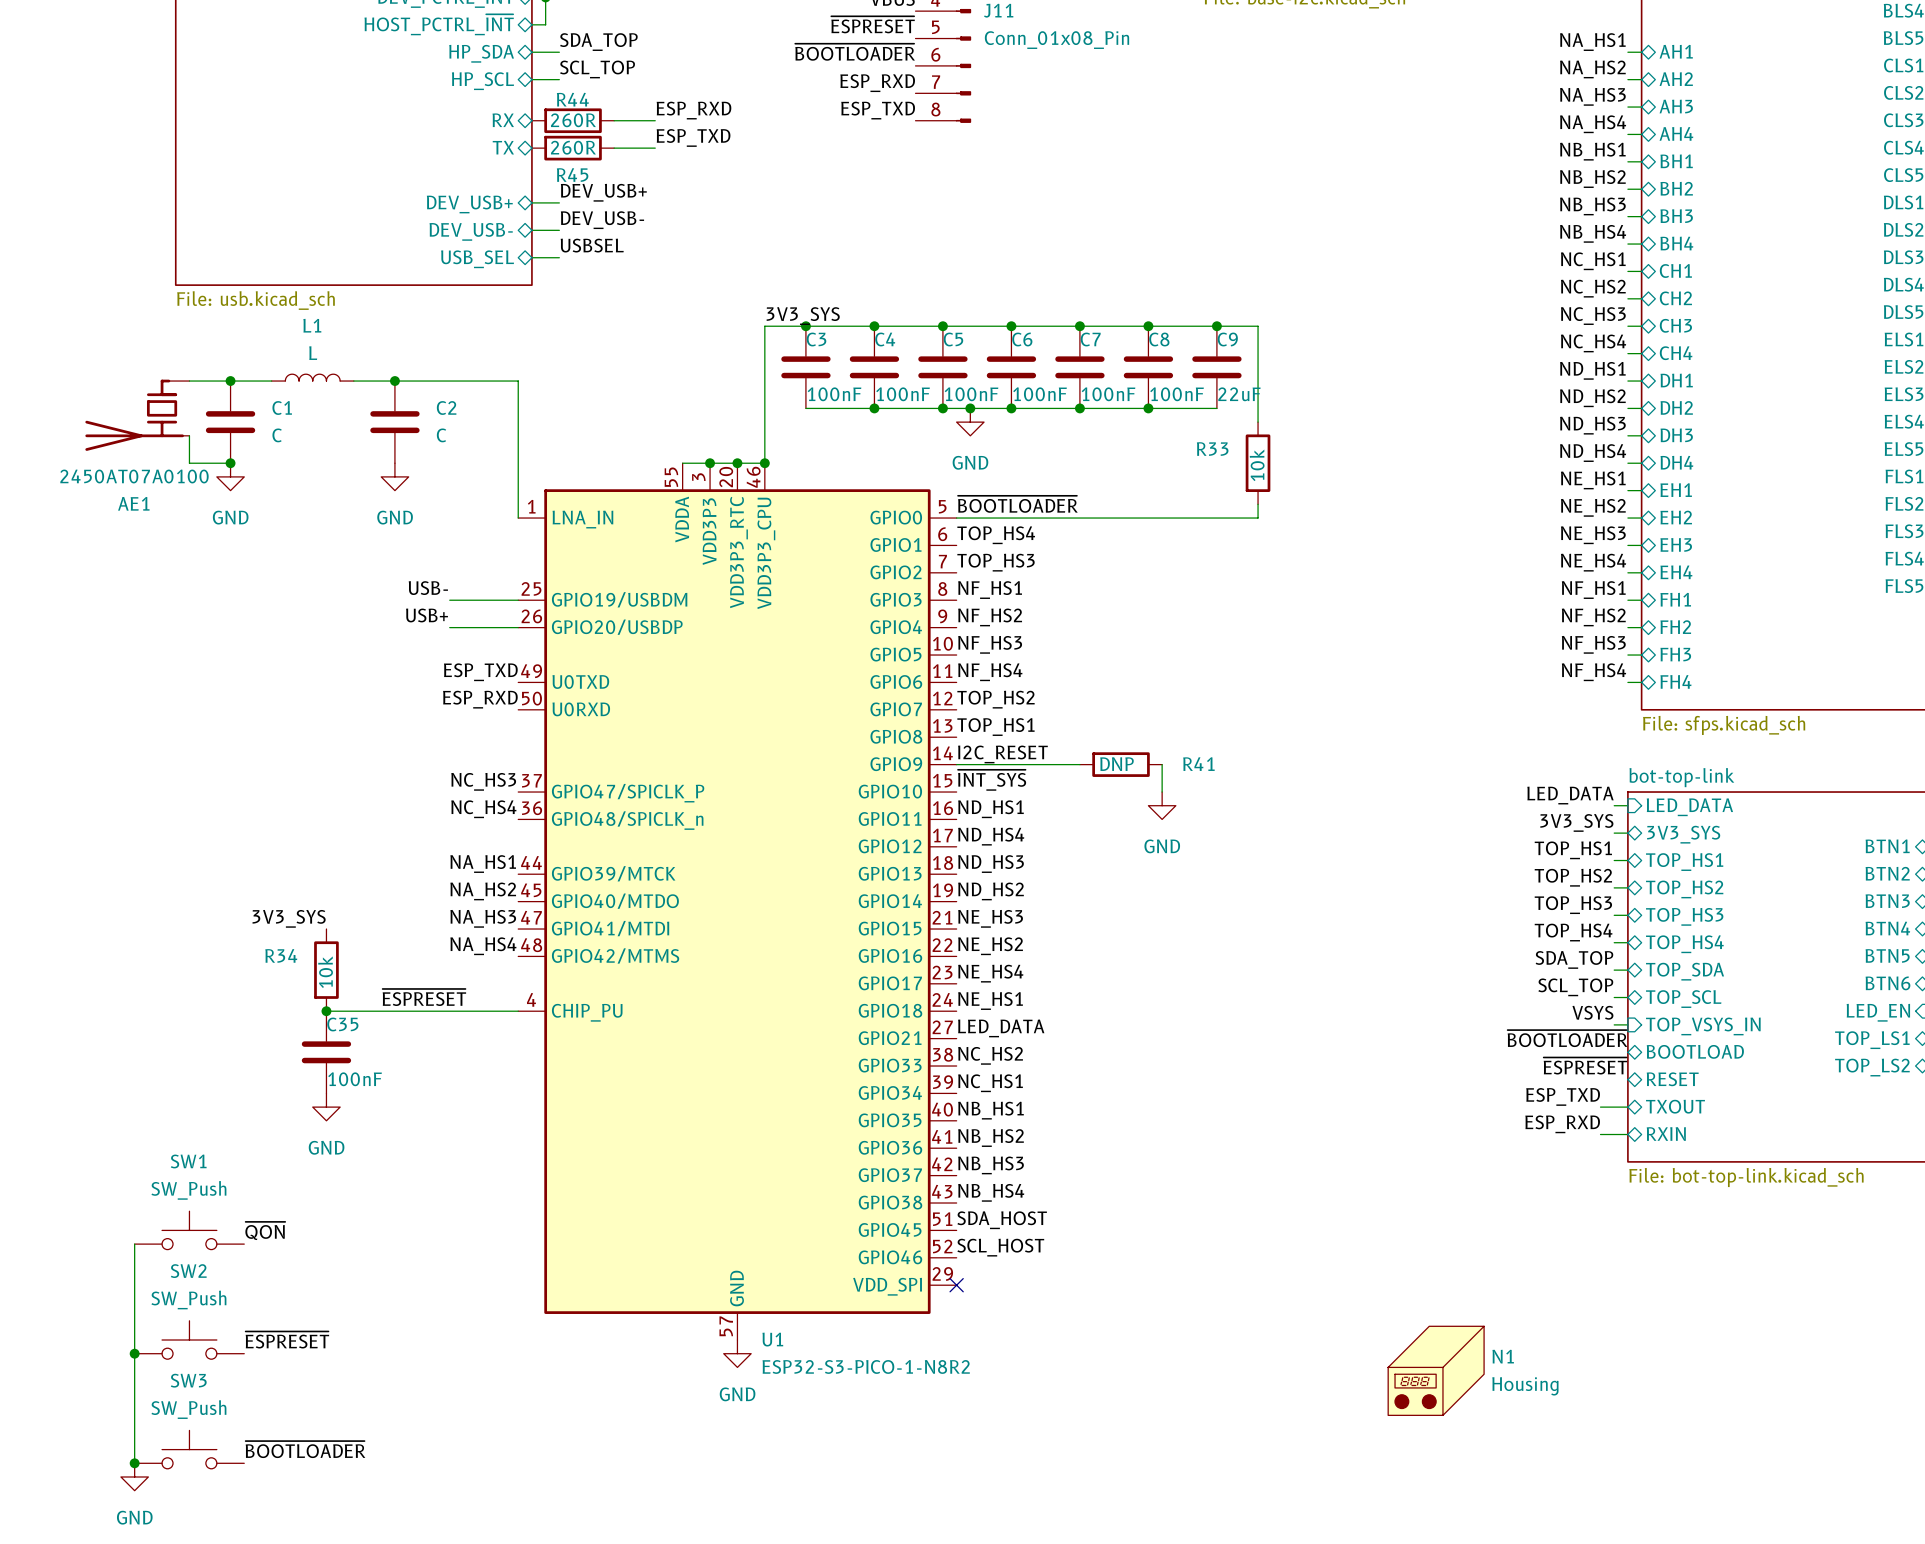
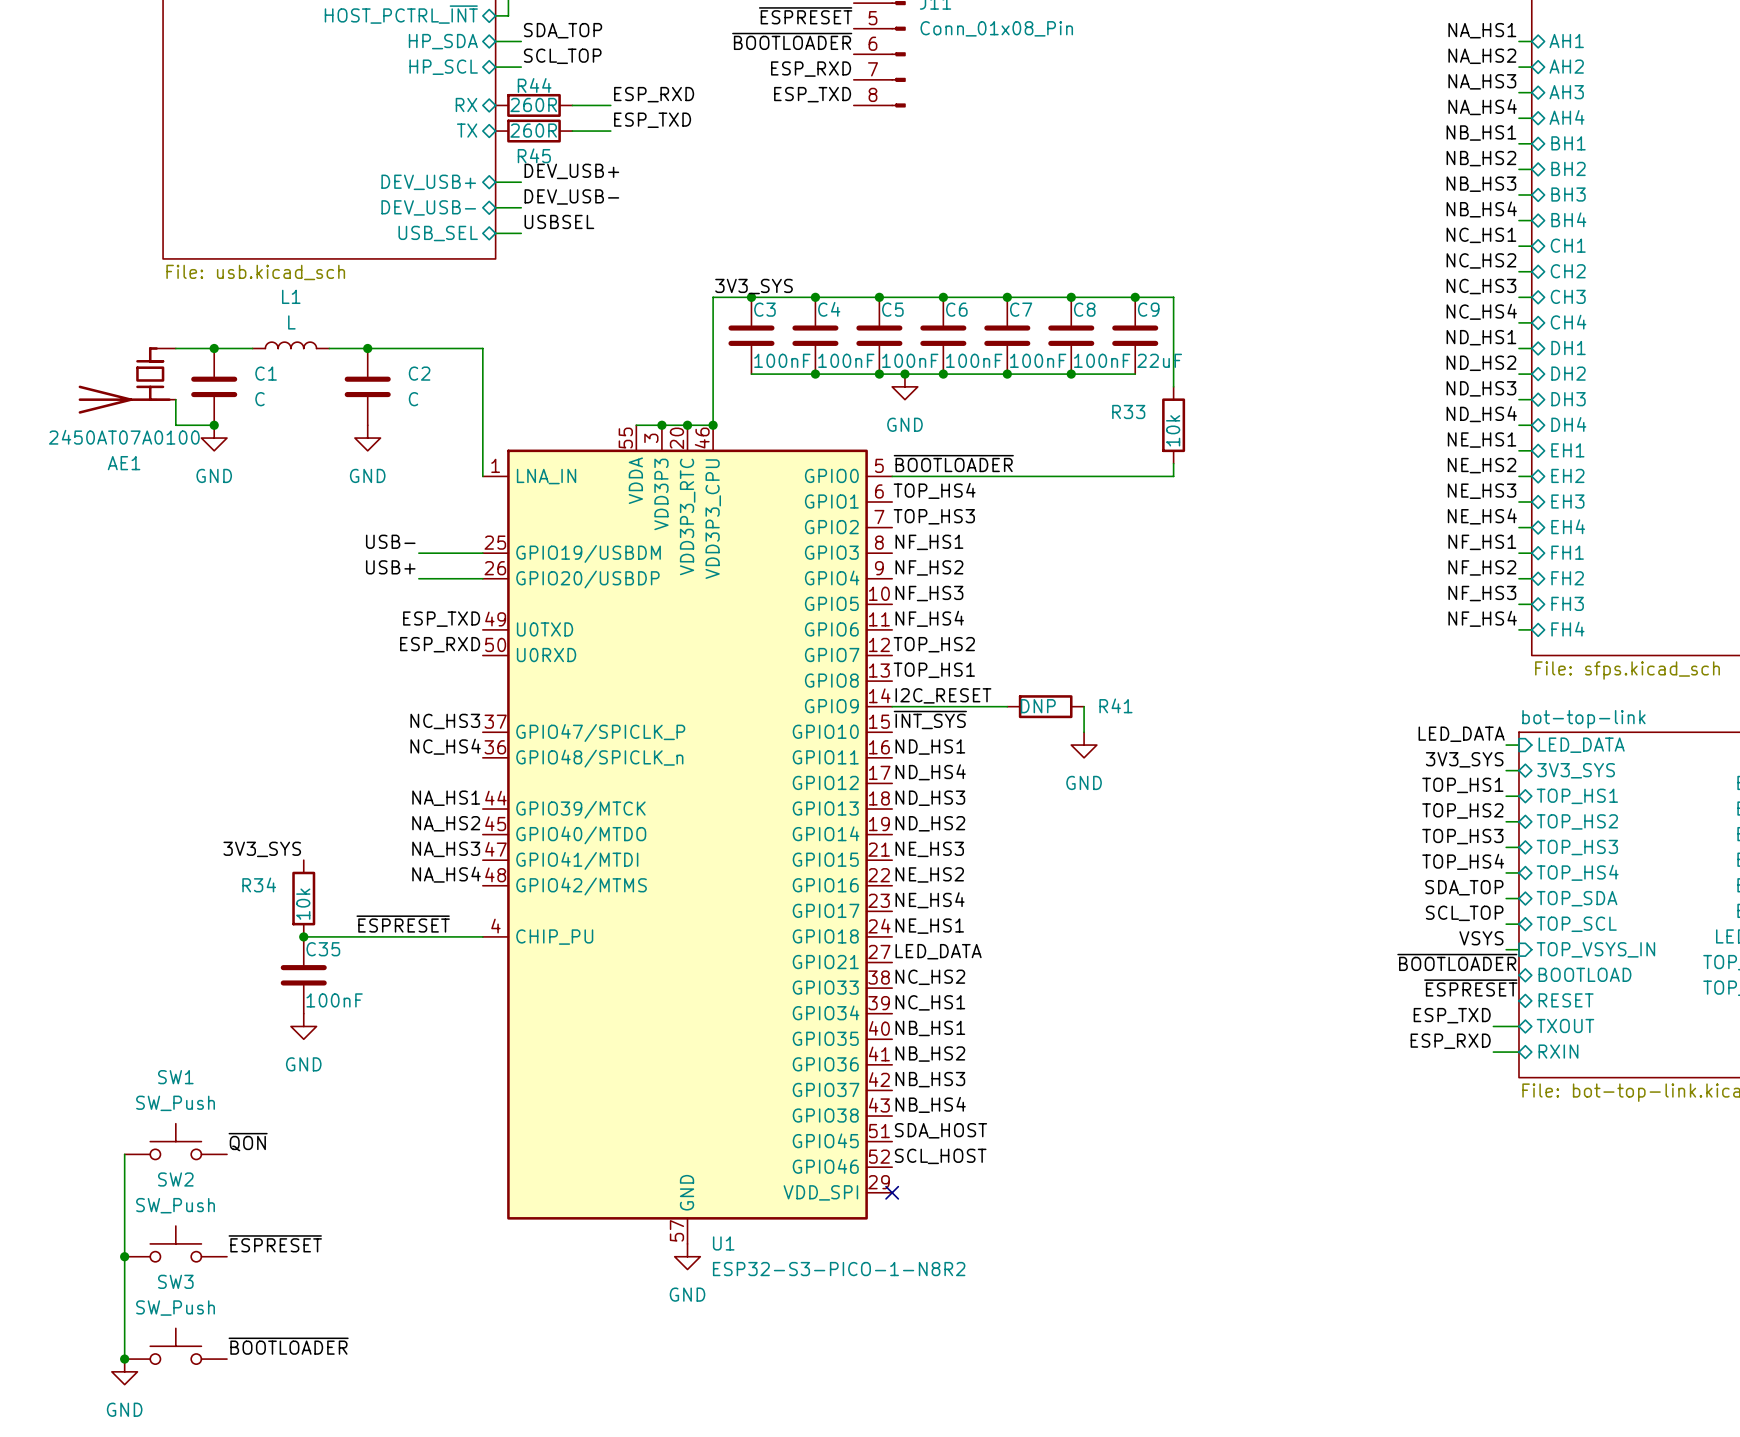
N1: Housing (1436, 1370) -> none

